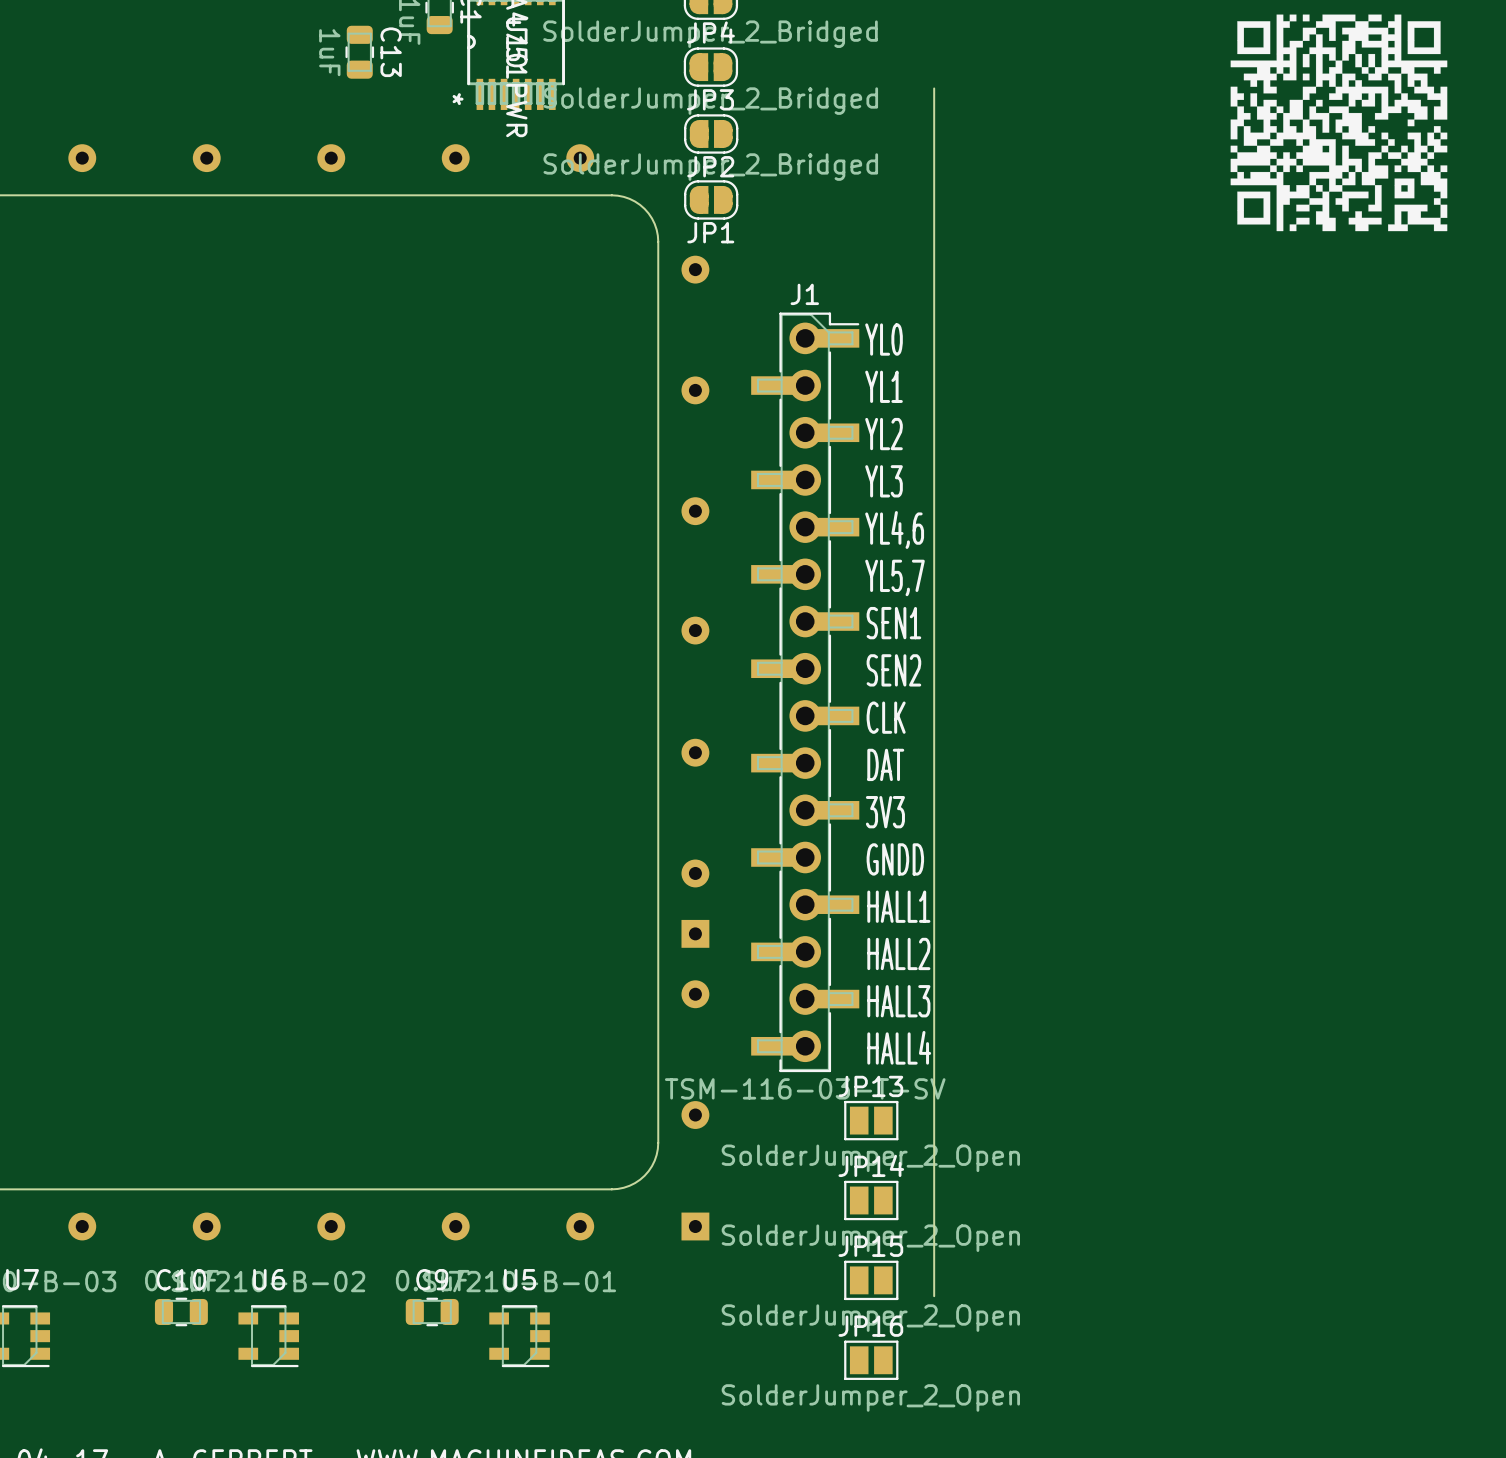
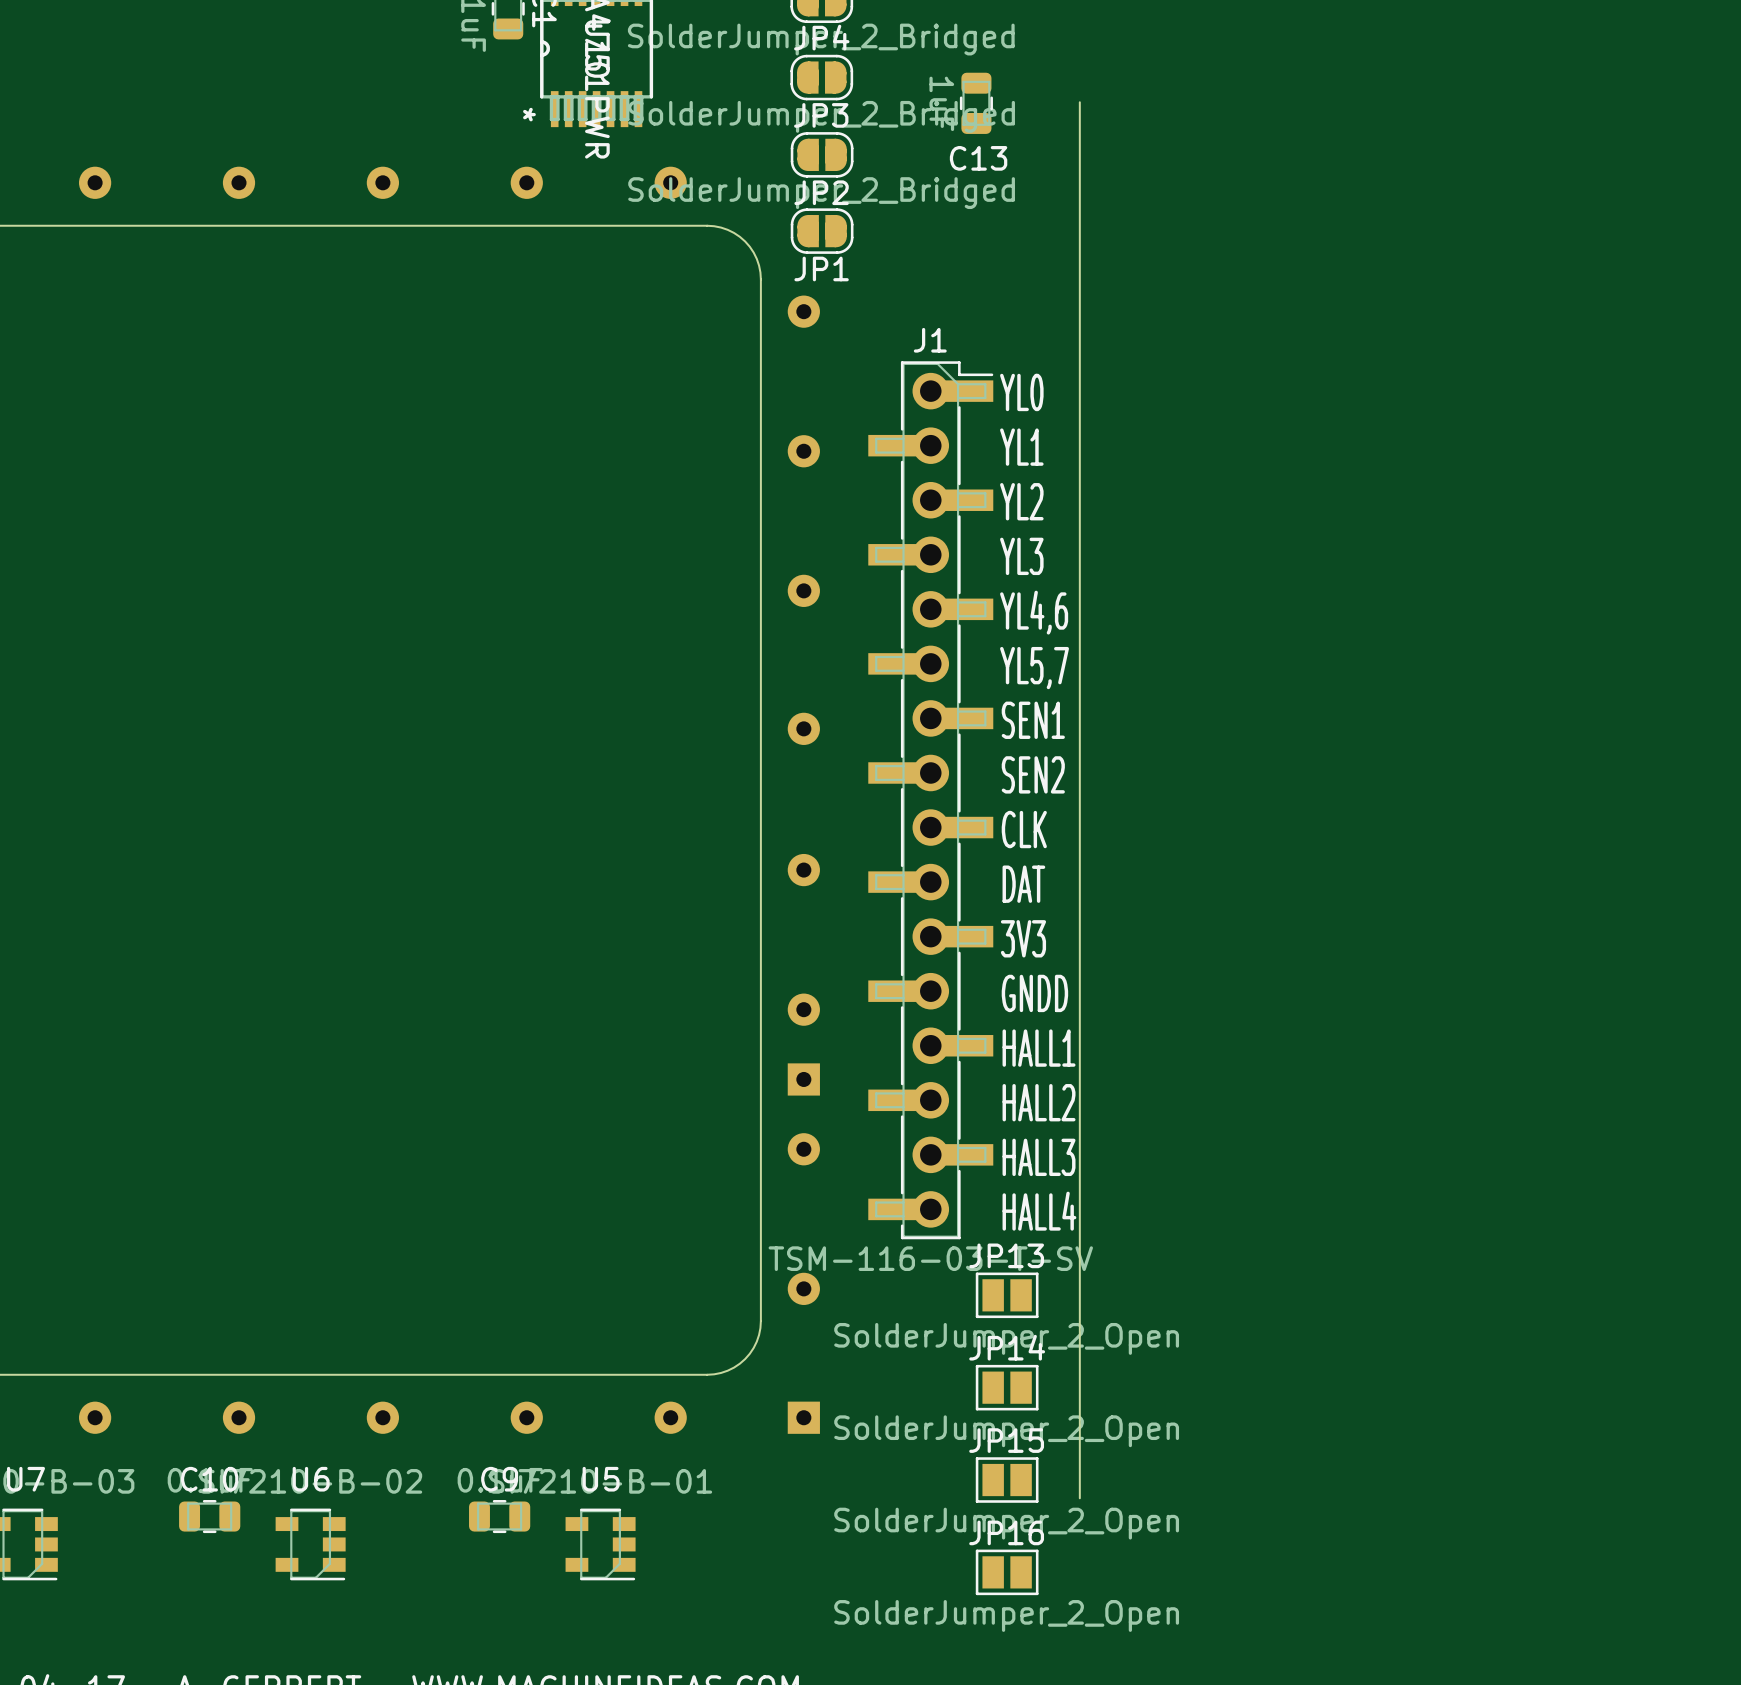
drawing: [1230, 14, 1448, 232] -> none
C13 position: (359, 52) -> (976, 103)
C13 name rotation: 0° (391, 52) -> 90° counterclockwise (978, 158)

